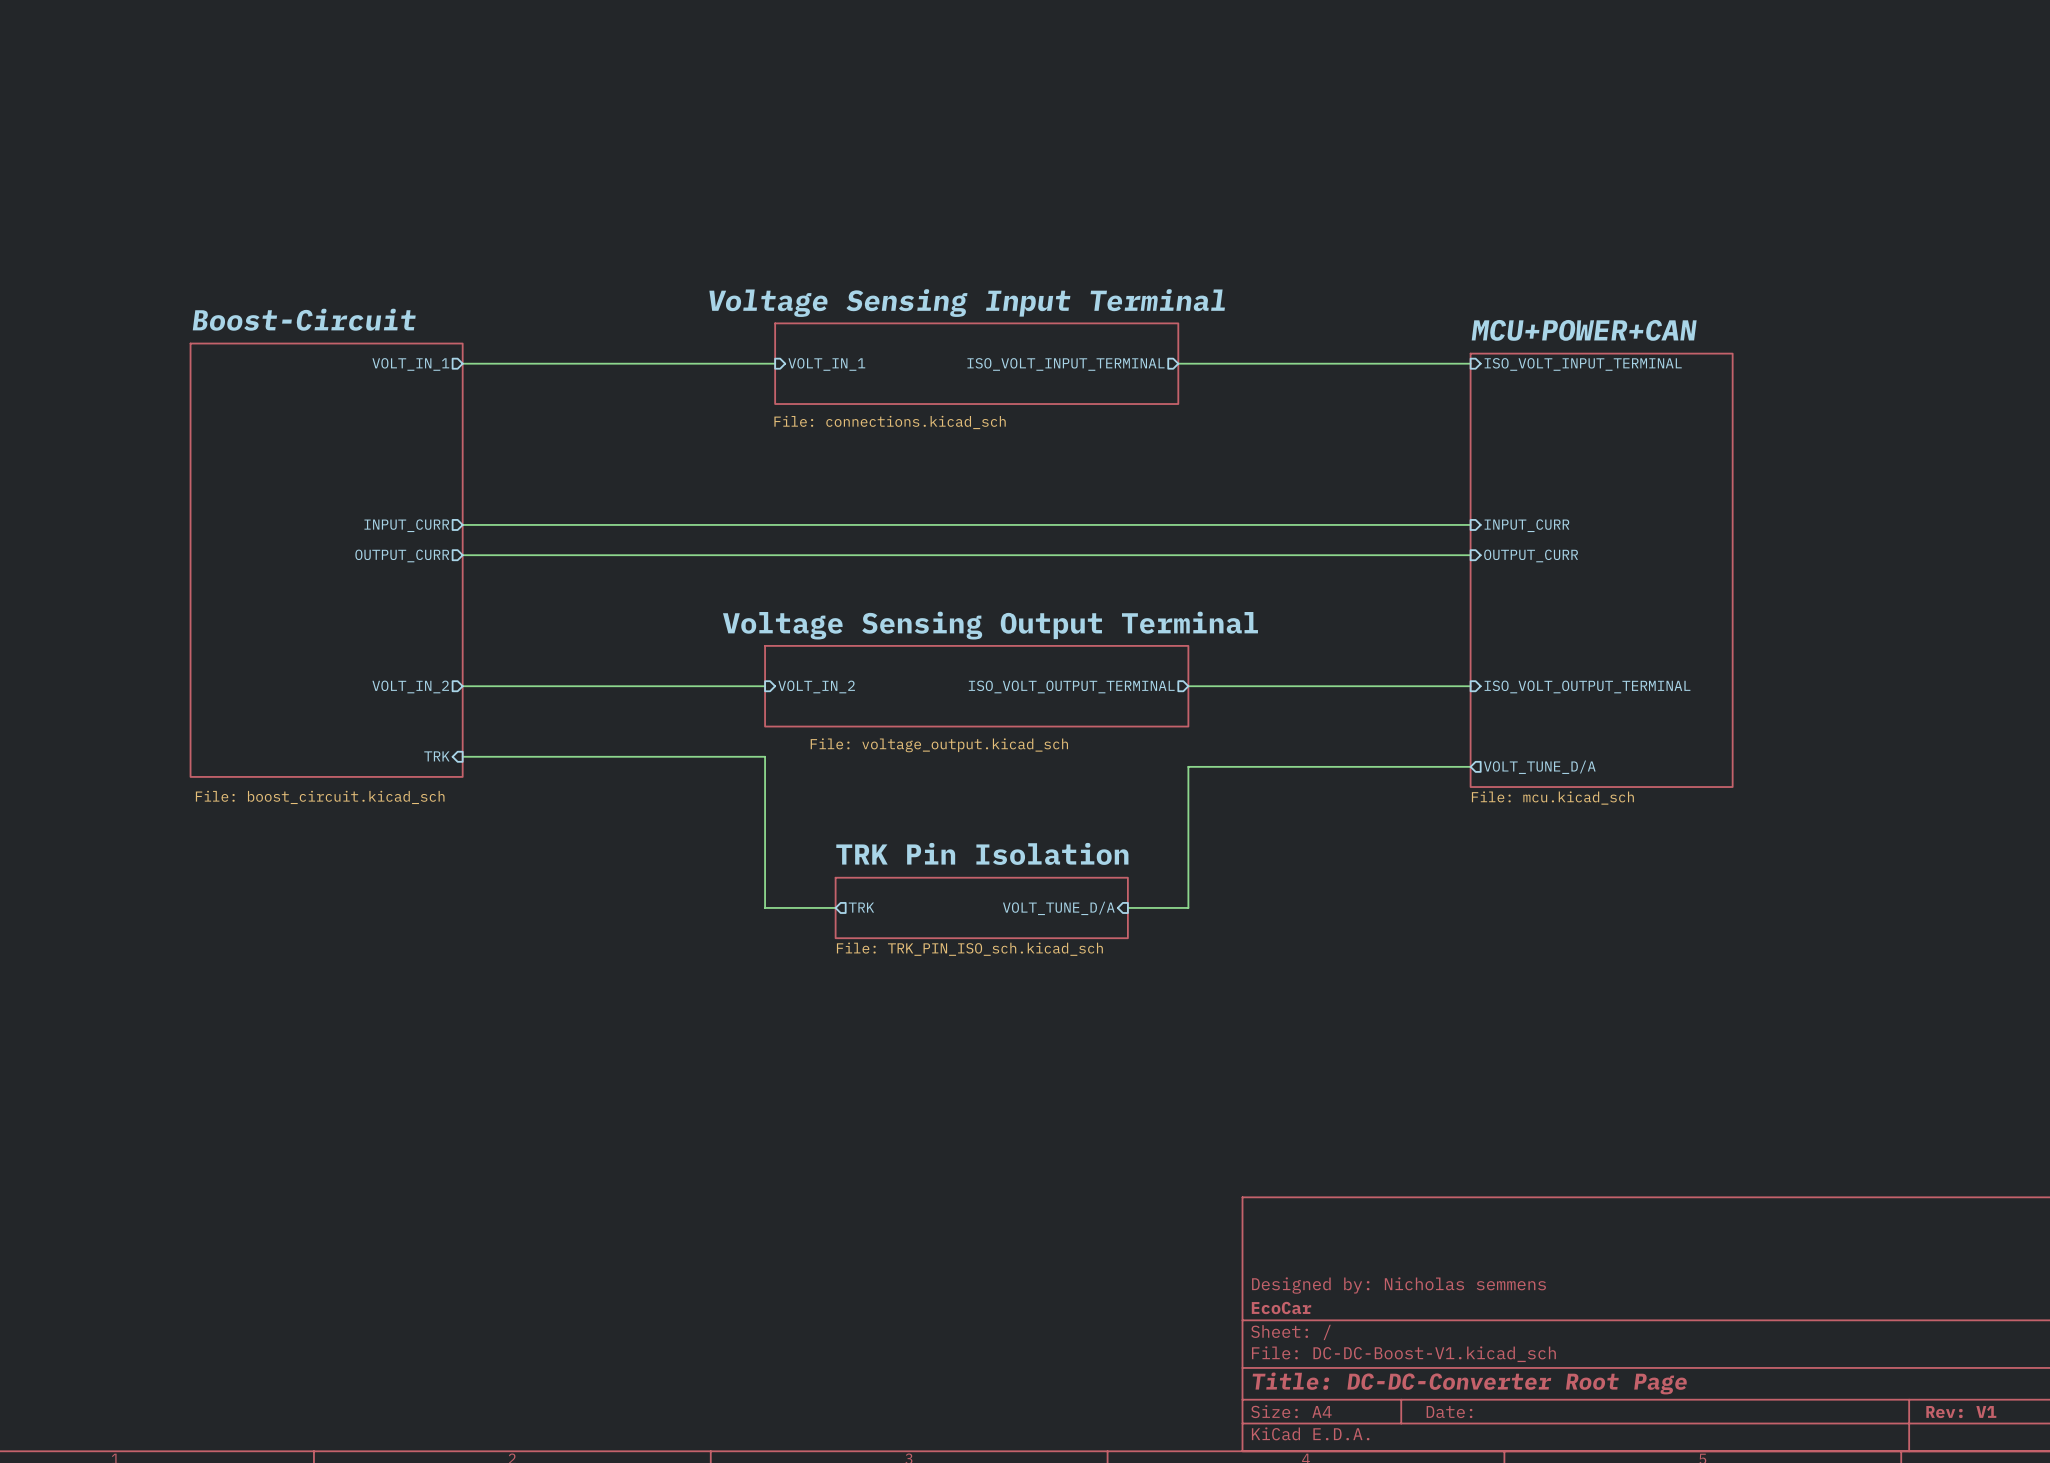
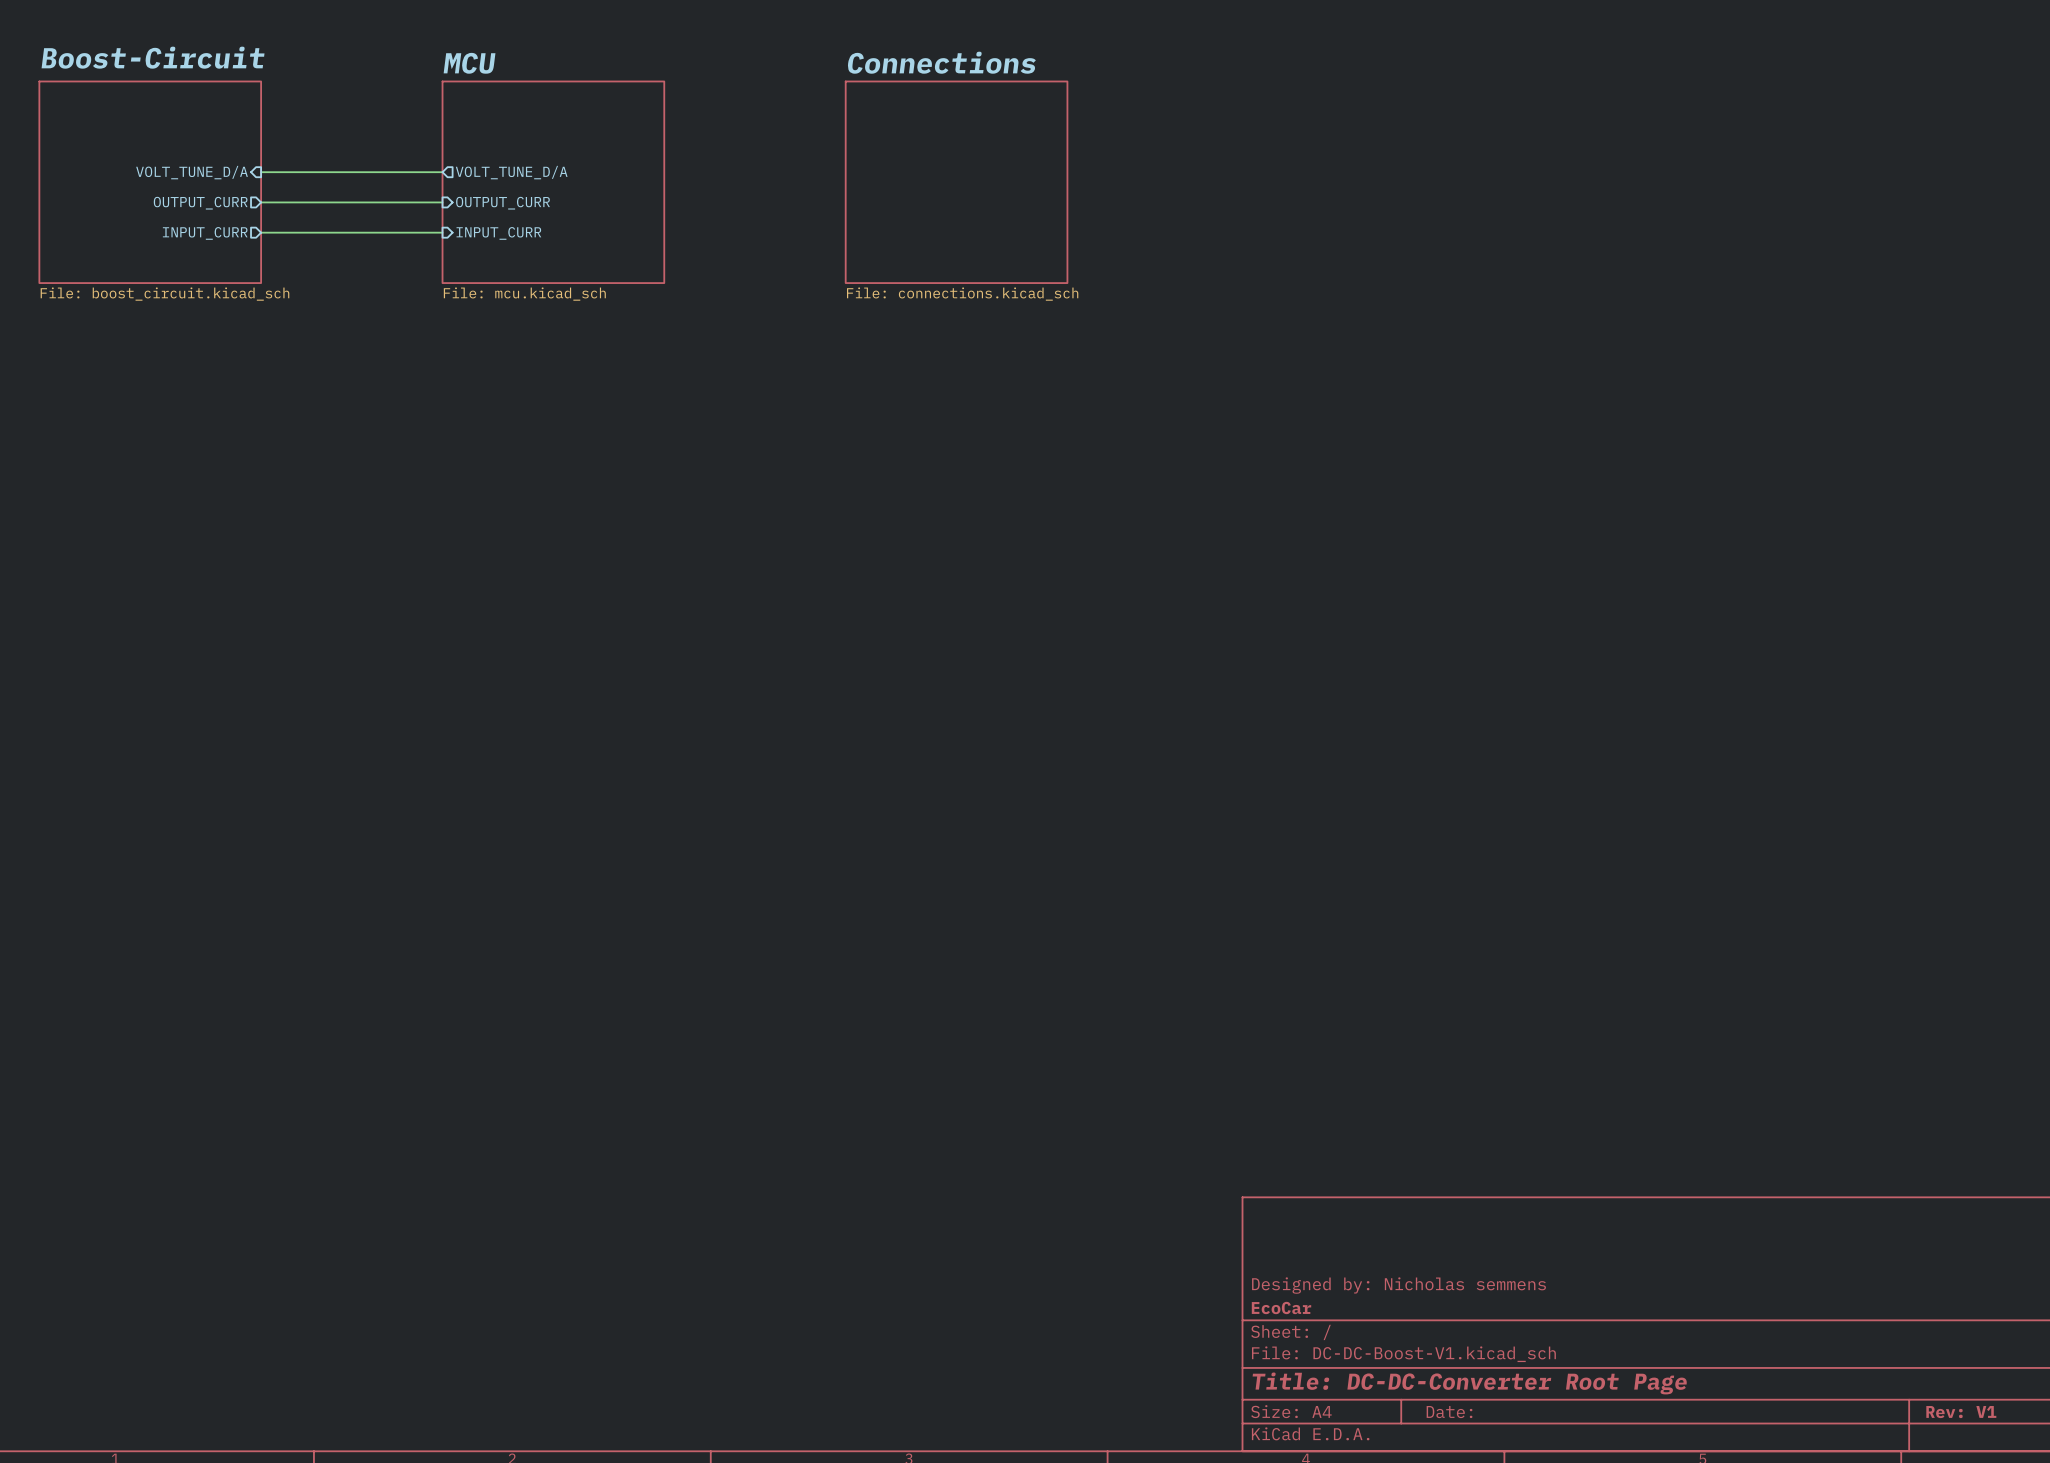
sheet pin: none -> VOLT_TUNE_D/A (192, 172)
wire: none -> (261, 172) (442, 172)
sheet pin: none -> VOLT_TUNE_D/A (511, 172)
sheet Boost-Circuit: none -> File: boost_circuit.kicad_sch (150, 182)
sheet MCU: none -> File: mcu.kicad_sch (553, 182)
sheet Connections: none -> File: connections.kicad_sch (956, 182)
wire: none -> (261, 202) (442, 202)
sheet pin: none -> OUTPUT_CURR (200, 203)
sheet pin: none -> OUTPUT_CURR (503, 203)
wire: none -> (261, 232) (442, 232)
sheet pin: none -> INPUT_CURR (205, 233)
sheet pin: none -> INPUT_CURR (498, 233)
wire: (462, 363) (775, 363) -> none
sheet Voltage Sensing Input Terminal: File: connections.kicad_sch (976, 363) -> none
wire: (1178, 363) (1470, 363) -> none
sheet pin: VOLT_IN_1 (410, 364) -> none
sheet pin: VOLT_IN_1 (826, 364) -> none
sheet pin: ISO_VOLT_INPUT_TERMINAL (1066, 364) -> none
sheet pin: ISO_VOLT_INPUT_TERMINAL (1583, 364) -> none
wire: (462, 524) (1470, 524) -> none
sheet pin: INPUT_CURR (406, 525) -> none
sheet pin: INPUT_CURR (1526, 525) -> none
sheet pin: OUTPUT_CURR (402, 555) -> none
wire: (462, 555) (1470, 555) -> none
sheet pin: OUTPUT_CURR (1531, 555) -> none
sheet Boost-Circuit: File: boost_circuit.kicad_sch (326, 560) -> none
sheet MCU+POWER+CAN: File: mcu.kicad_sch (1601, 570) -> none
sheet pin: VOLT_IN_2 (410, 686) -> none
wire: (462, 686) (765, 686) -> none
sheet pin: VOLT_IN_2 (816, 686) -> none
sheet Voltage Sensing Output Terminal: File: voltage_output.kicad_sch (976, 686) -> none
sheet pin: ISO_VOLT_OUTPUT_TERMINAL (1071, 686) -> none
wire: (1188, 686) (1470, 686) -> none
sheet pin: ISO_VOLT_OUTPUT_TERMINAL (1587, 686) -> none
sheet pin: TRK (436, 756) -> none
wire: (462, 756) (765, 756) (765, 907) (835, 907) -> none
wire: (1470, 766) (1188, 766) (1188, 907) (1127, 907) -> none
sheet pin: VOLT_TUNE_D/A (1539, 767) -> none
sheet pin: TRK (861, 907) -> none
sheet TRK Pin Isolation: File: TRK_PIN_ISO_sch.kicad_sch (981, 907) -> none
sheet pin: VOLT_TUNE_D/A (1058, 908) -> none

